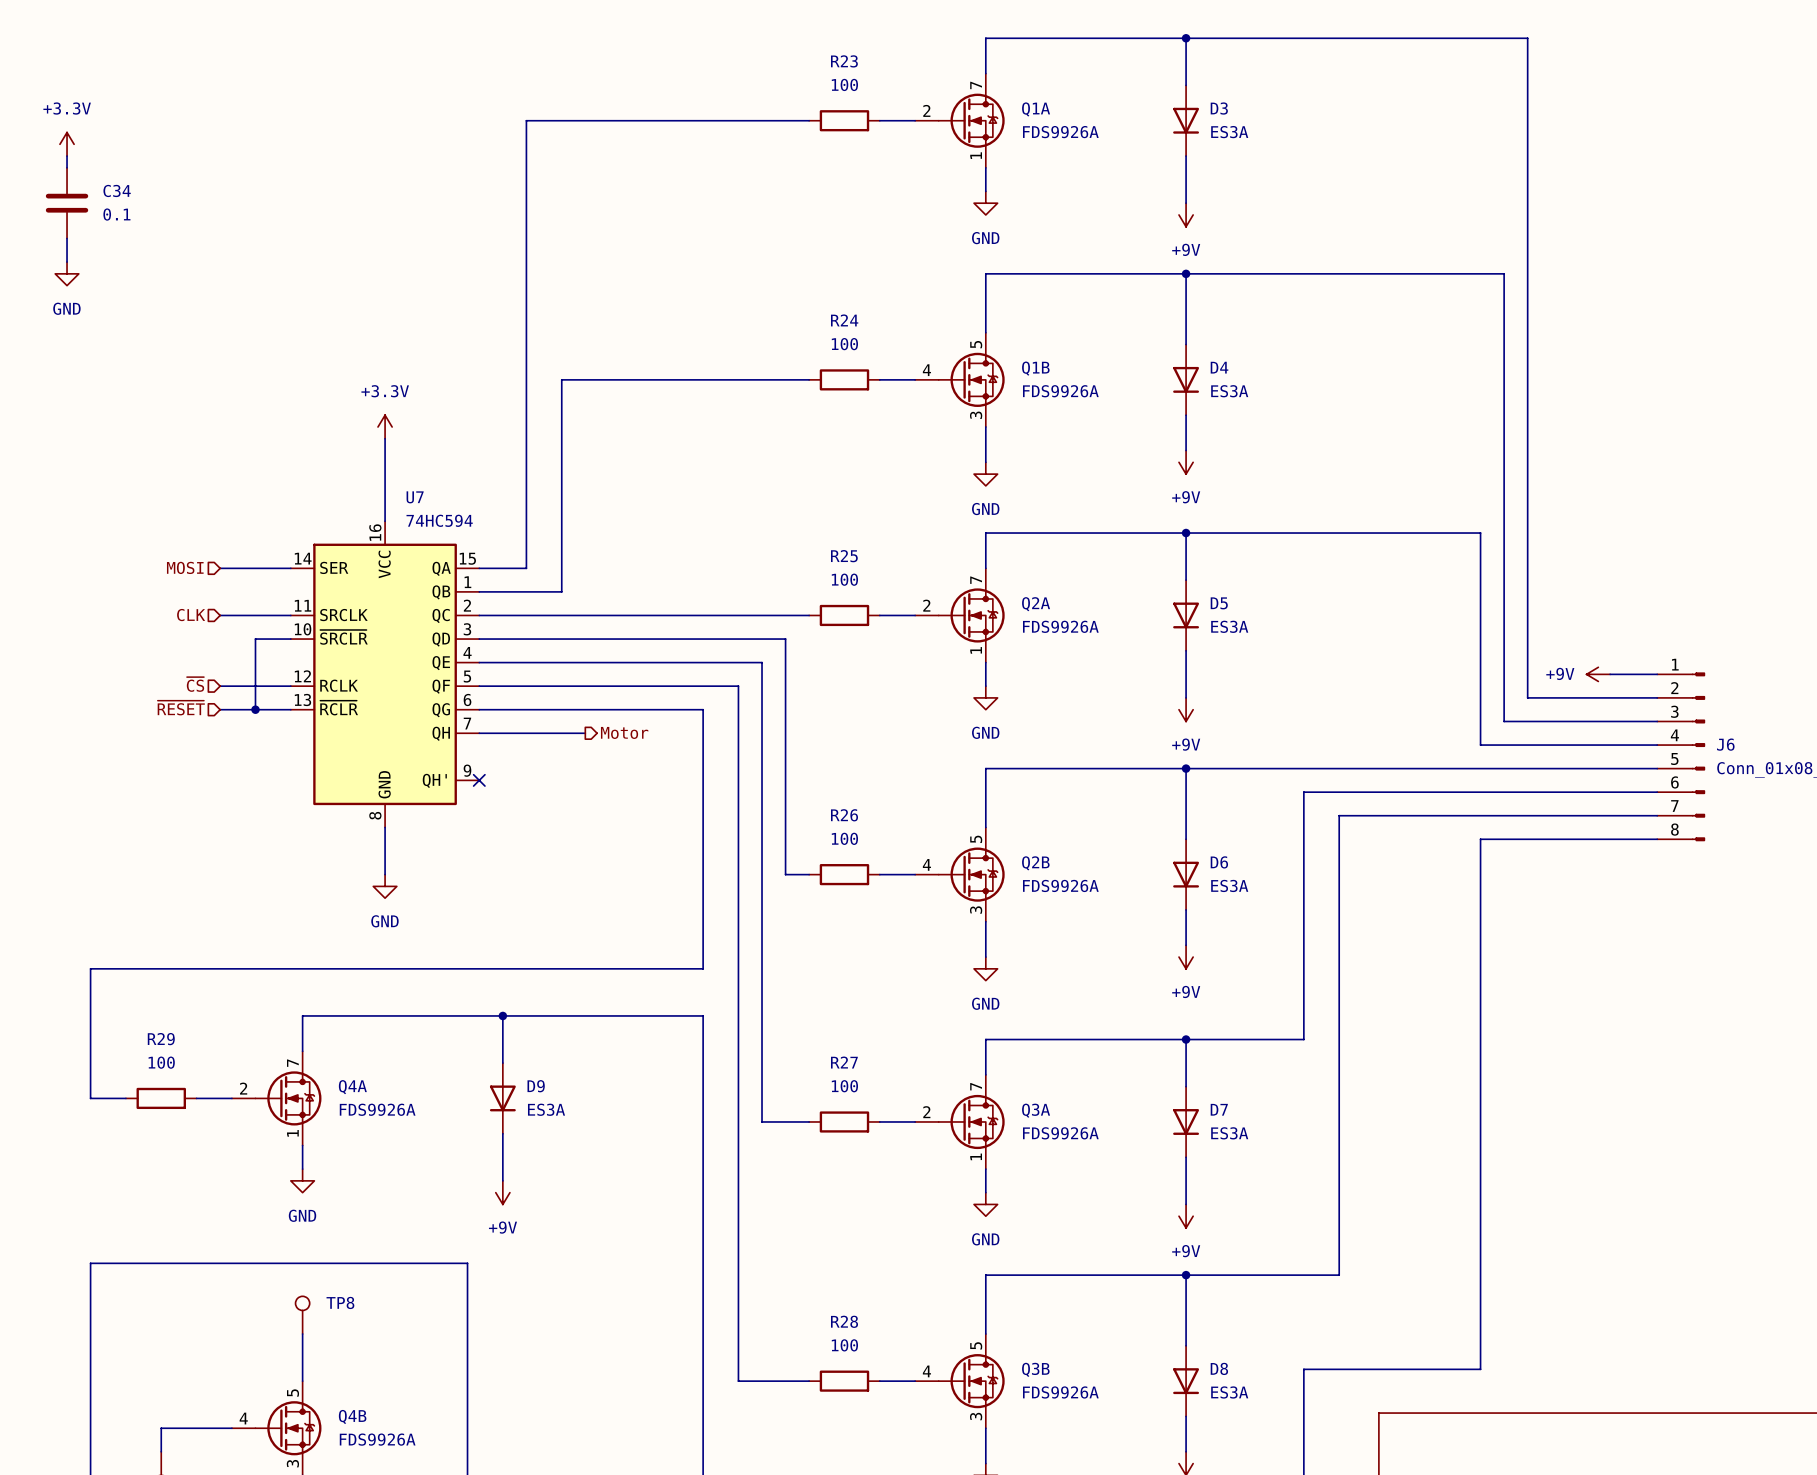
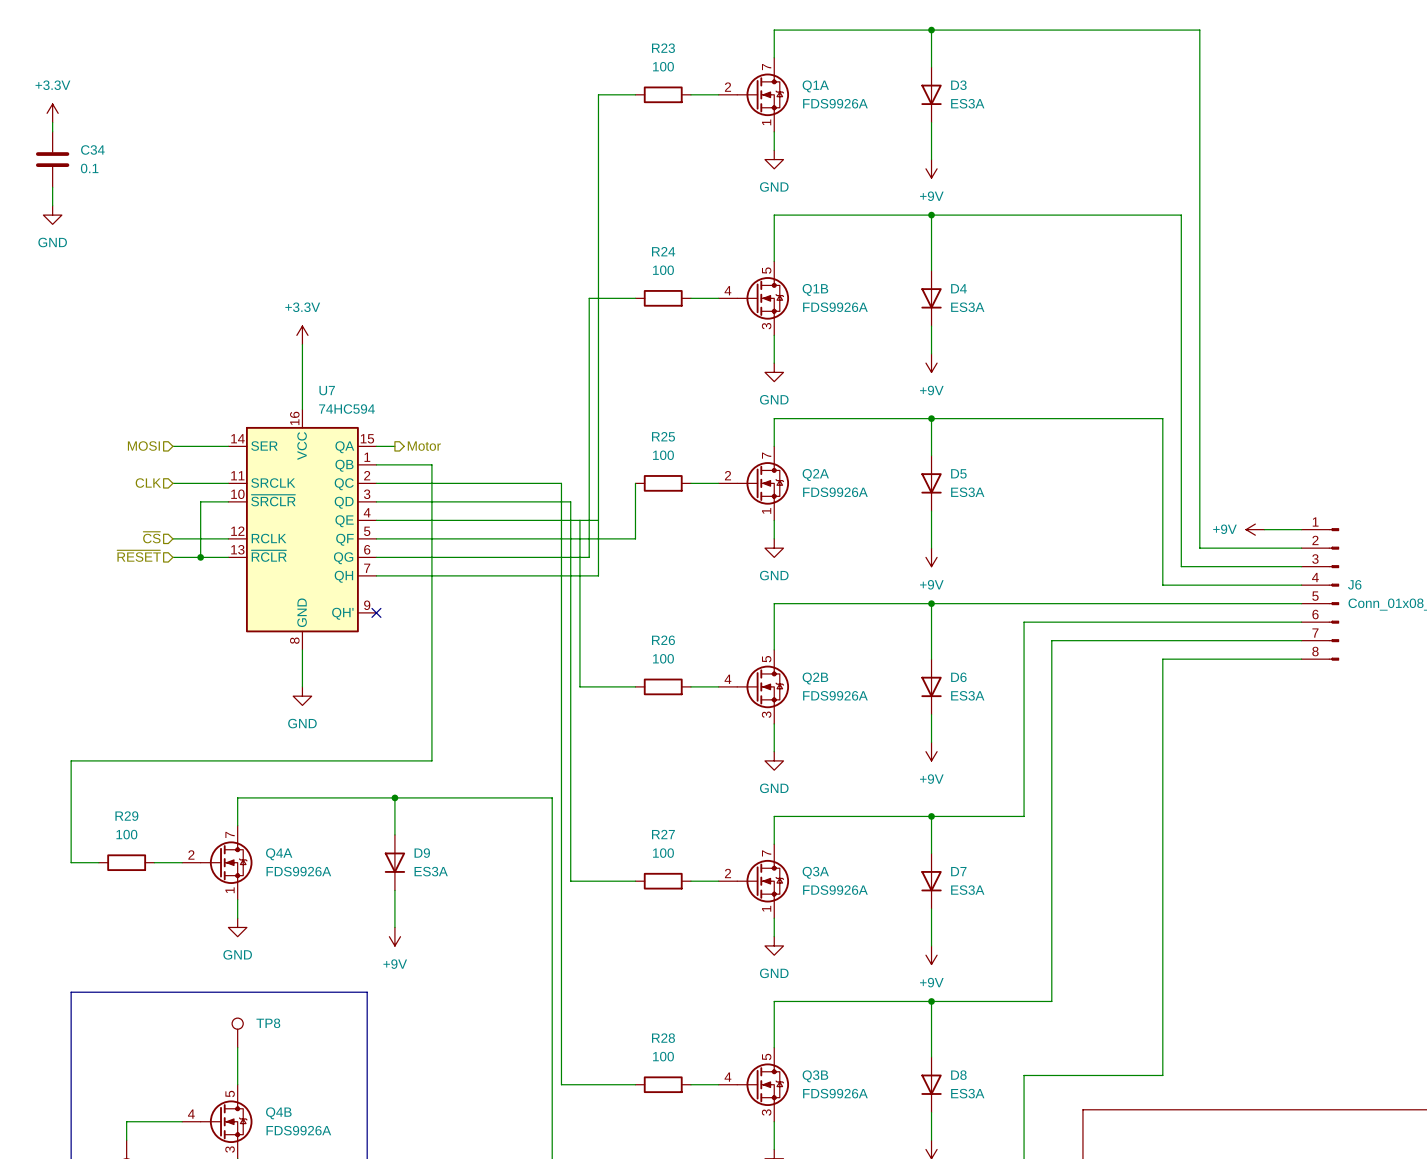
wire: (762, 120) (526, 120) (526, 568) (502, 568) -> (598, 94) (598, 520)
wire: (750, 379) (561, 379) (561, 591) (549, 591) -> (589, 298) (589, 557) (552, 557)
wire: (714, 615) (809, 615) -> (579, 520) (579, 538) (635, 538) (635, 483)
wire: (726, 639) (785, 639) (785, 874) -> (579, 686) (616, 686)
wire: (703, 709) (703, 968) (549, 968) -> (431, 464) (431, 760)
hierarchical label position: Motor (624, 732) -> Motor (424, 446)
wire: none -> (459, 575) (598, 575)
wire: (762, 733) (762, 1121) -> (570, 501) (570, 881) (598, 881)
wire: (738, 874) (738, 1381) -> (561, 483) (561, 1084) (579, 1084)

